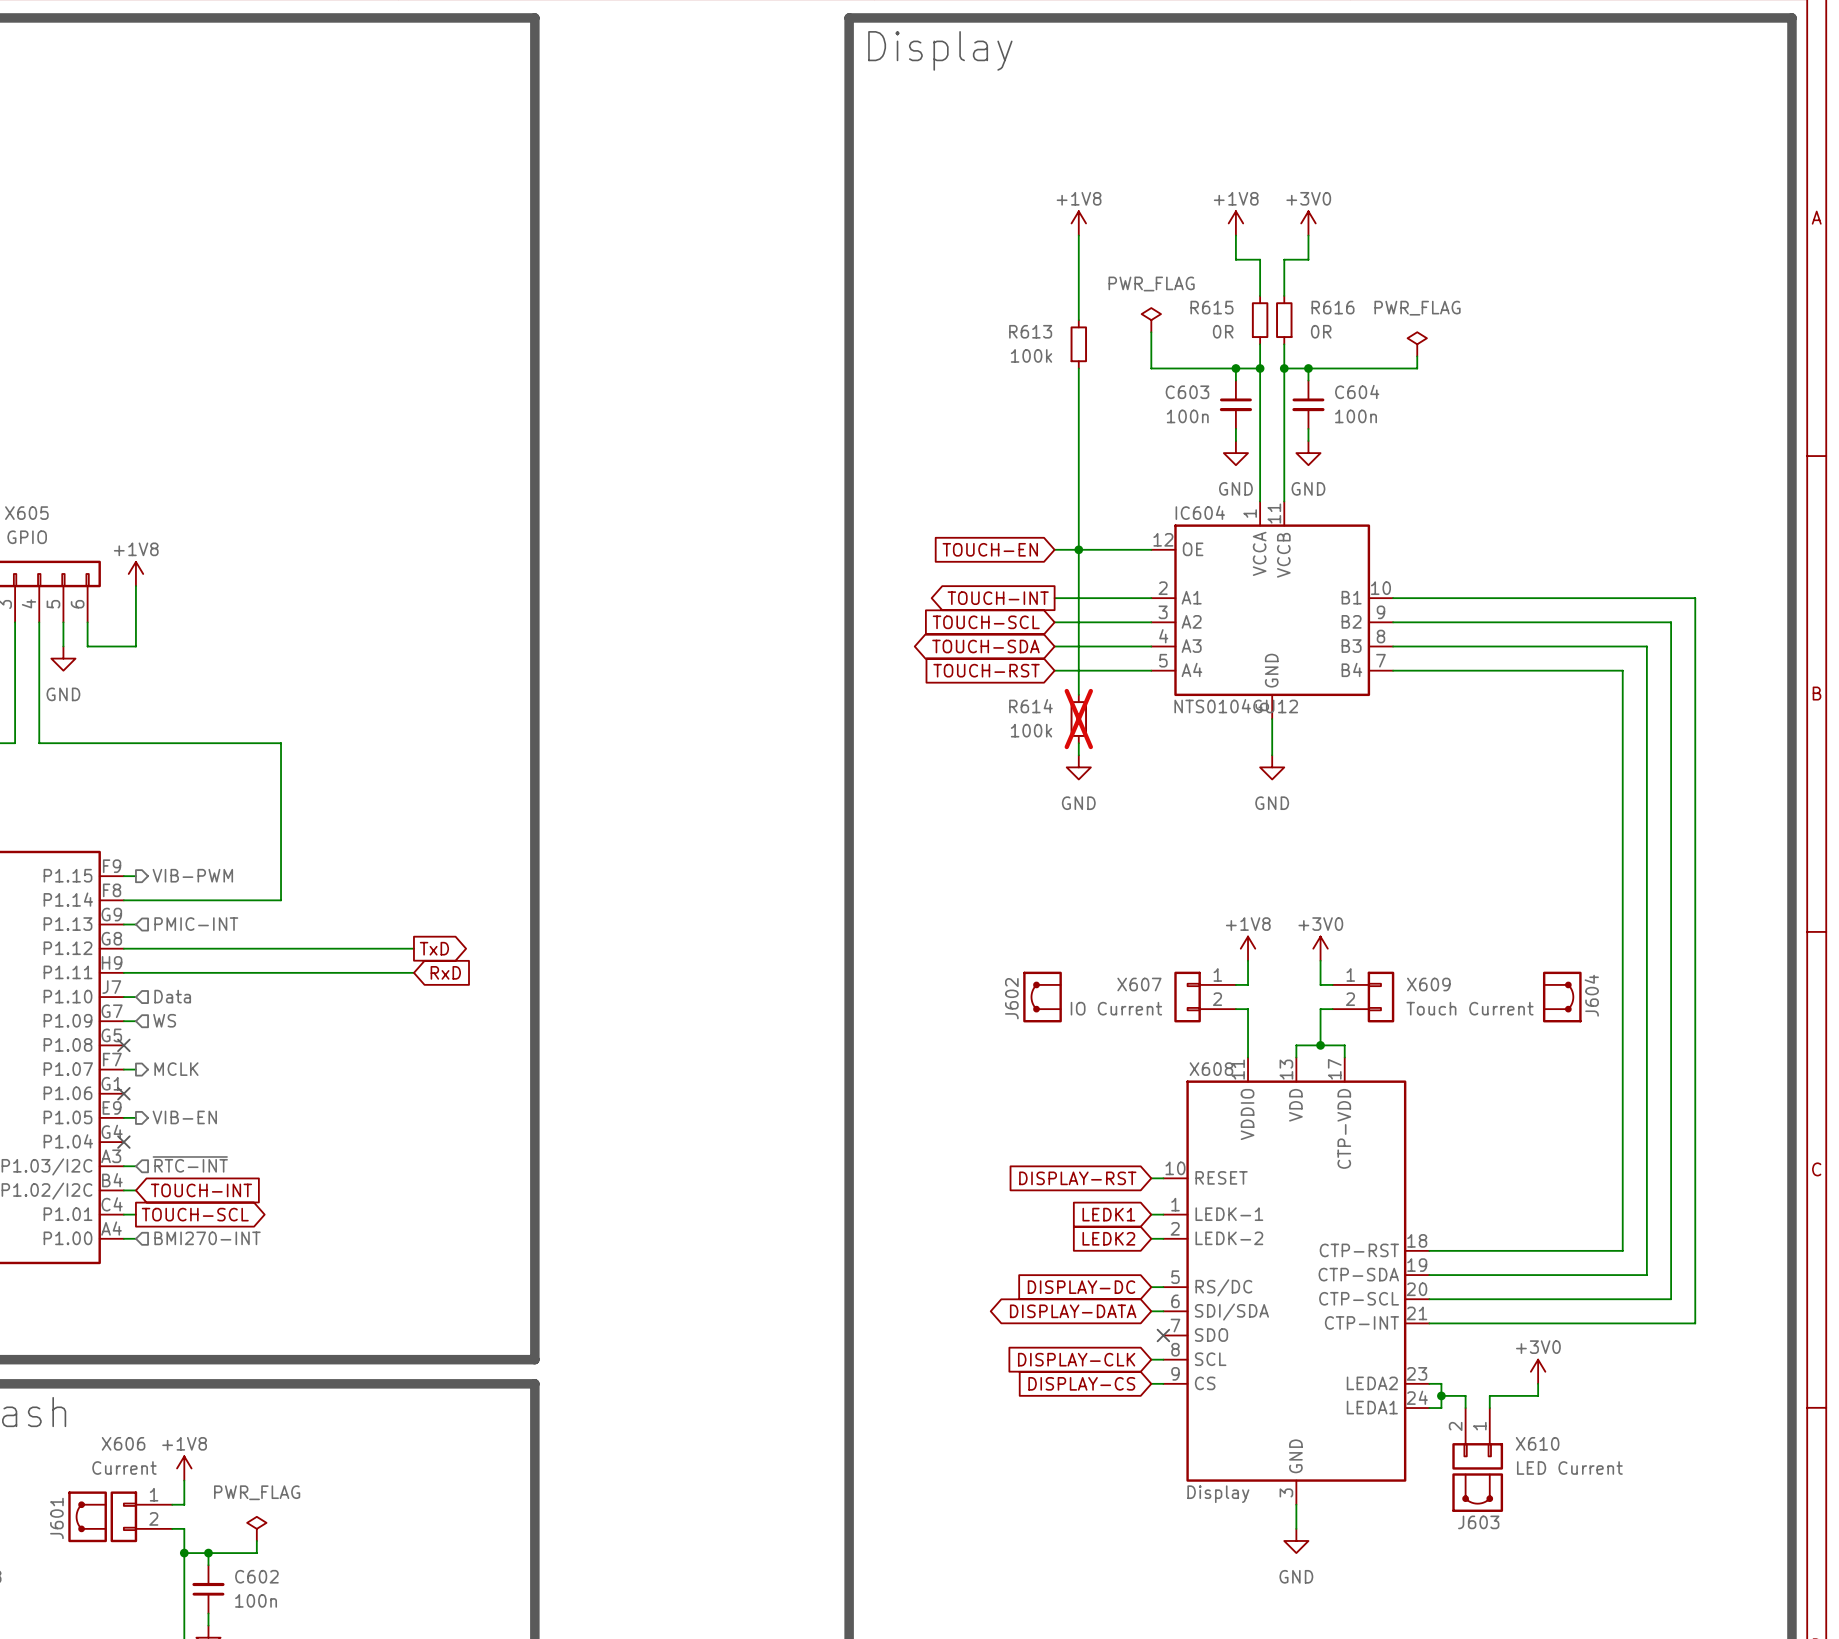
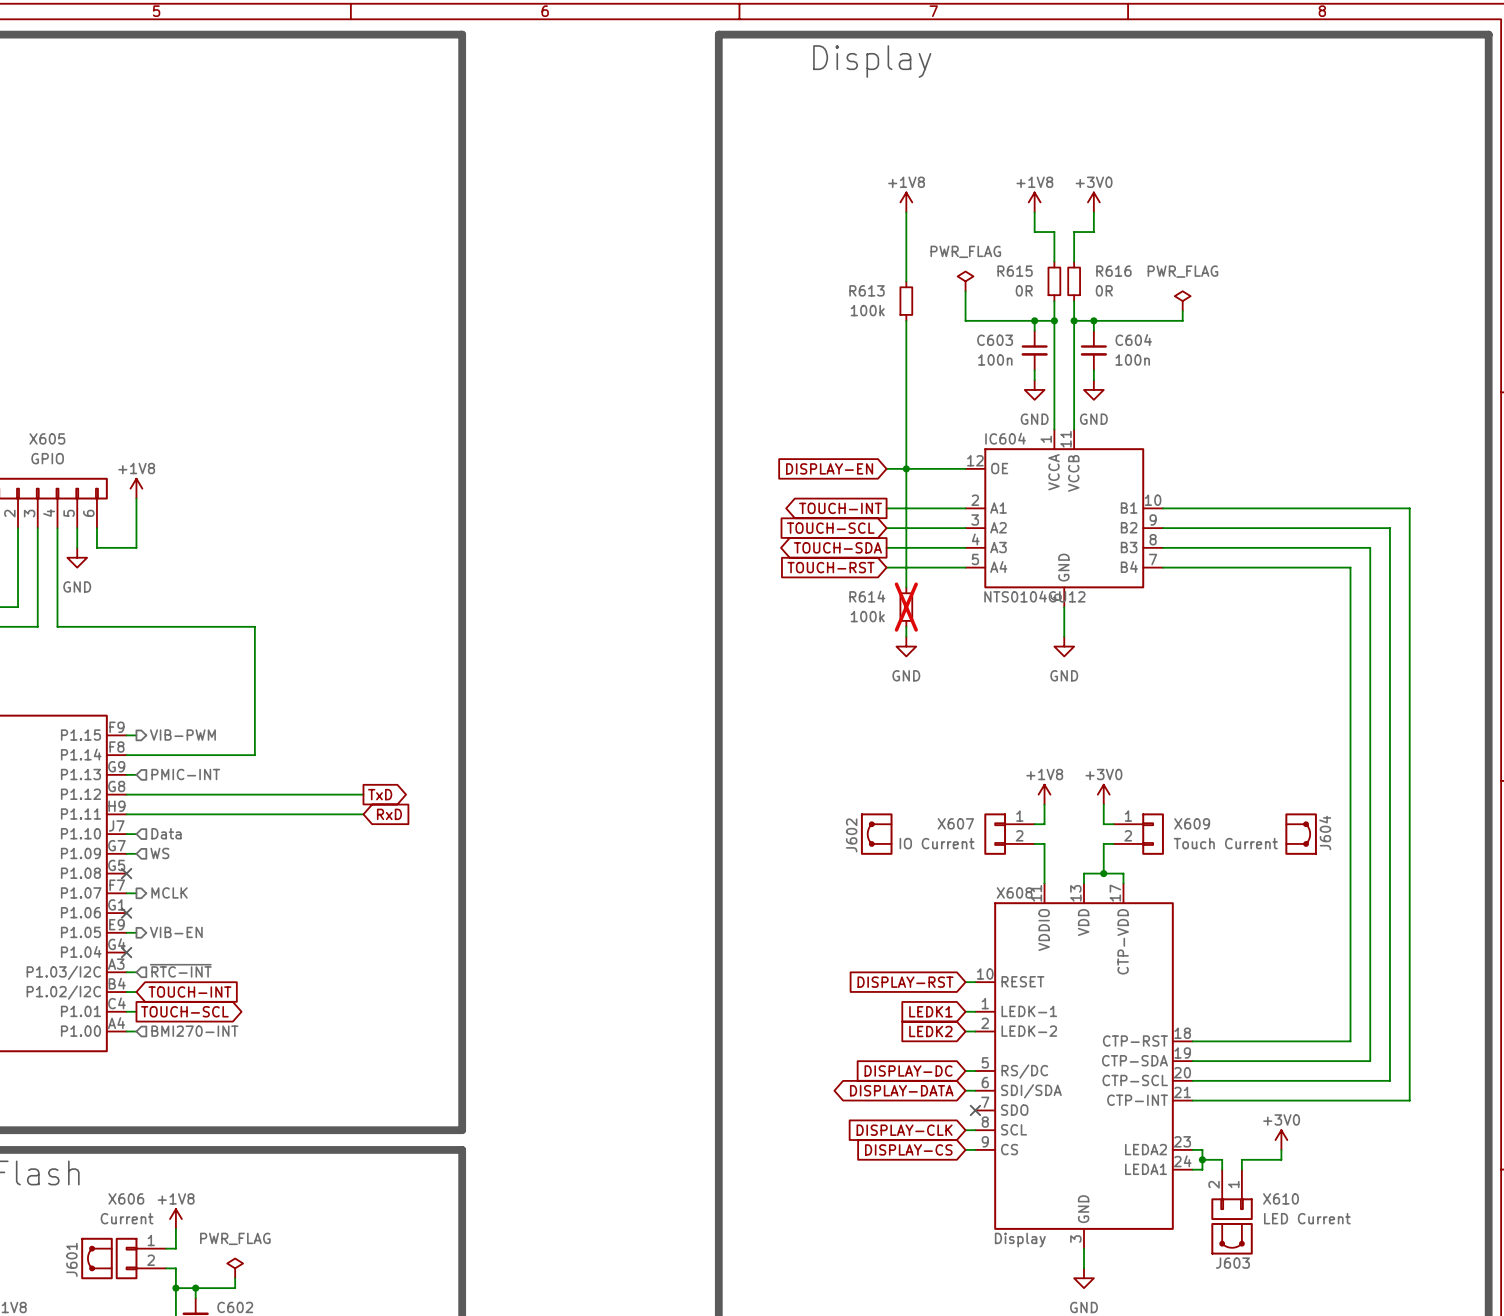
text position: Display (940, 50) -> Display (872, 61)
global label: TOUCH-EN (990, 549) -> DISPLAY-EN (829, 468)
global label shape: bidirectional (985, 646) -> output (837, 547)

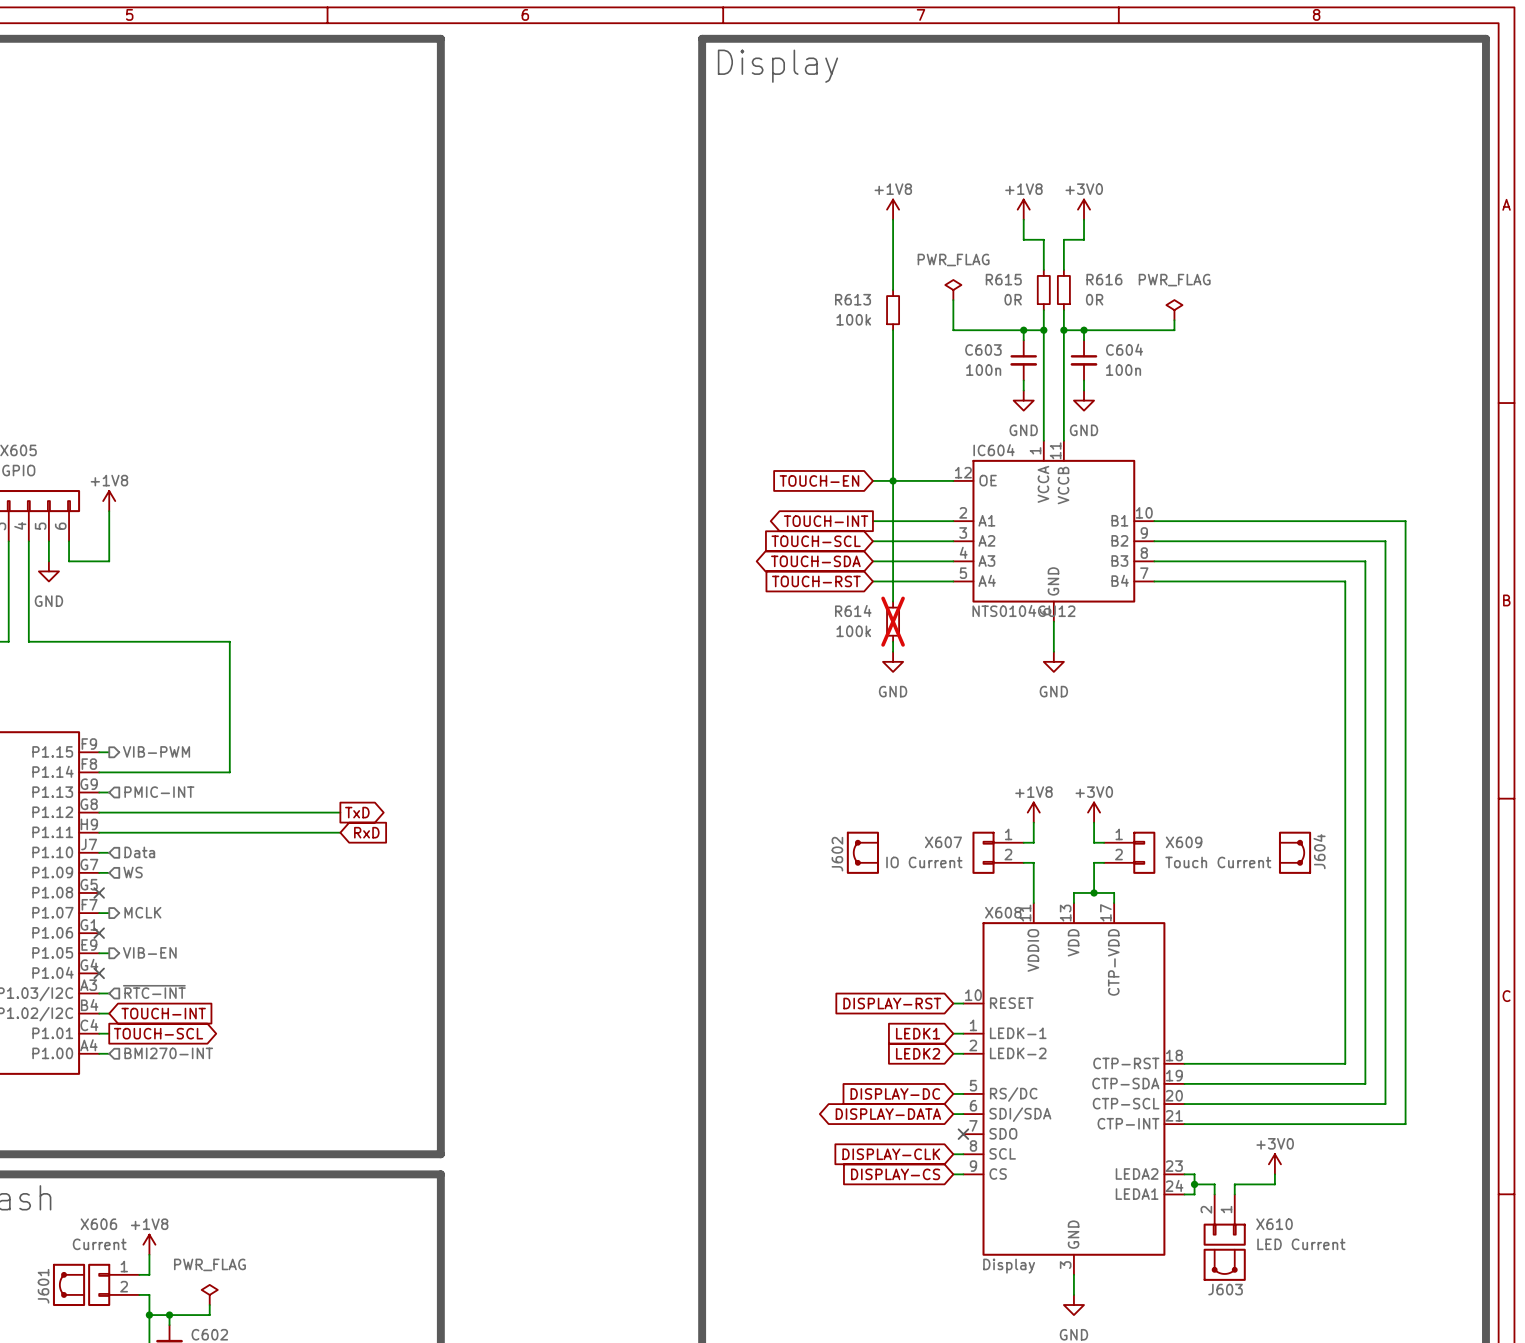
text position: Display (872, 61) -> Display (777, 66)
global label: DISPLAY-EN (829, 468) -> TOUCH-EN (819, 480)
global label shape: output (837, 547) -> bidirectional (815, 561)

